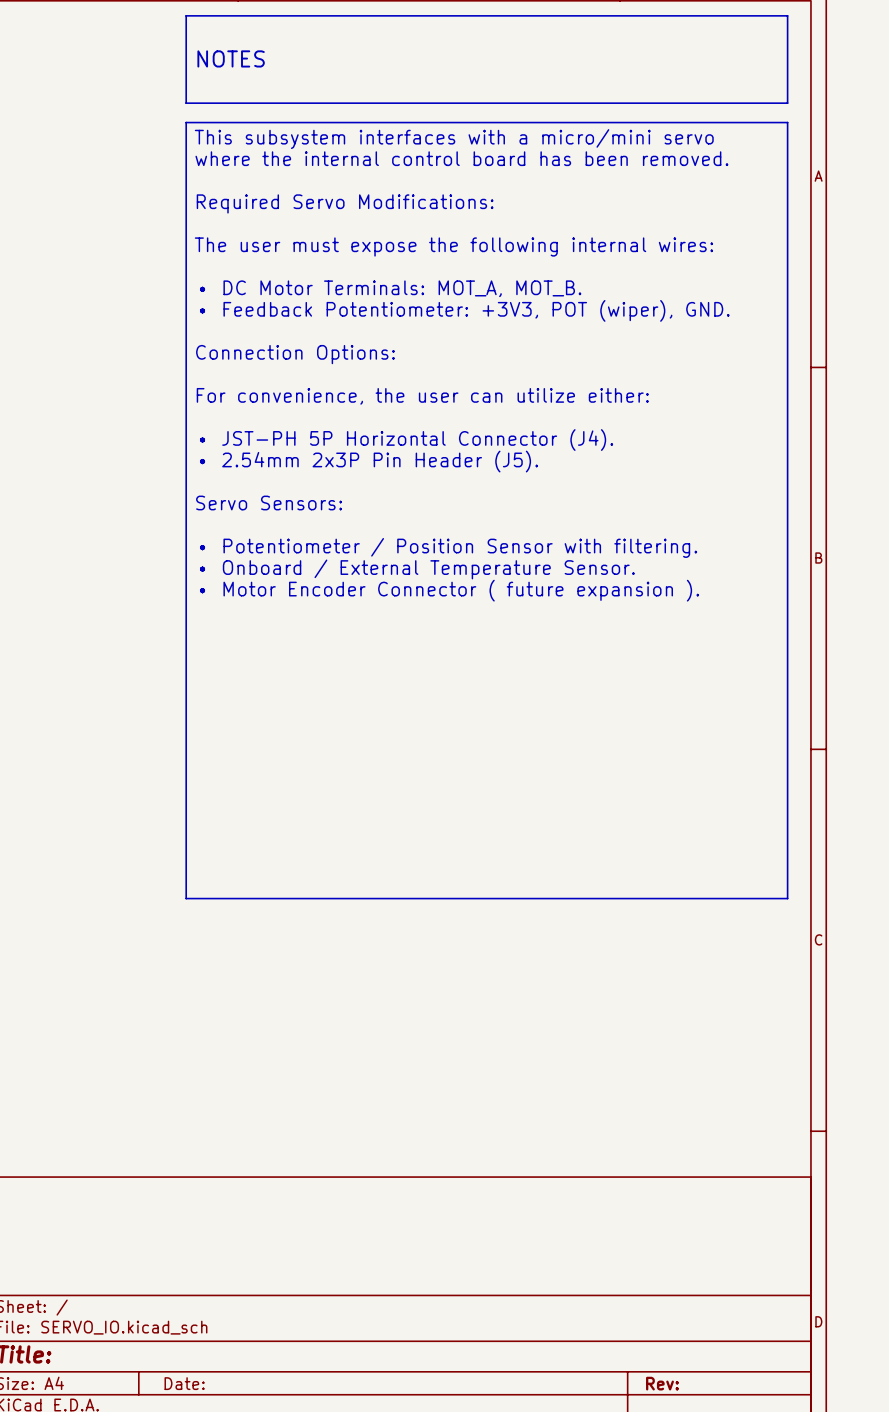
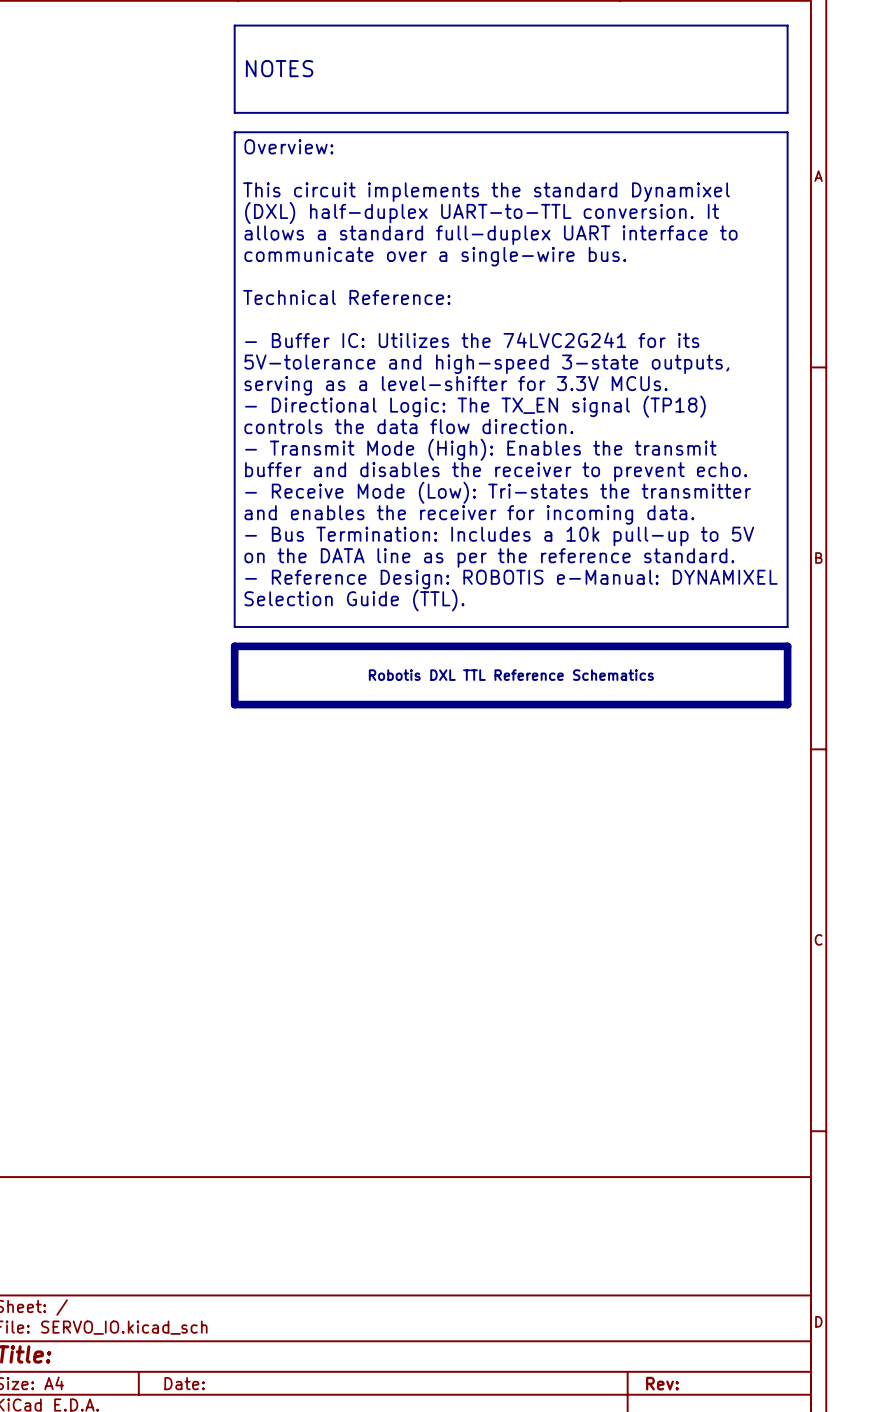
line: (787, 25) (787, 15) (186, 15) (186, 103) (787, 103) -> (787, 25) (234, 25) (234, 112) (787, 112) (787, 103)
text position: NOTES (231, 58) -> NOTES (279, 68)
line: (787, 132) (787, 122) (186, 122) (186, 898) (787, 898) (787, 704) -> (787, 132) (234, 132) (234, 626) (787, 626)
text: This subsystem interfaces with a micro/mini servo (454, 139) -> none
text: none -> Overview: (288, 146)
text: where the internal control board has been removed. (461, 158) -> none
text: none -> This circuit implements the standard Dynamixel (486, 192)
text: Required Servo Modifications: (345, 203) -> none
text: none -> (DXL) half-duplex UART-to-TTL conversion. It (482, 213)
text: none -> allows a standard full-duplex UART interface to (490, 235)
text: The user must expose the following internal wires: (453, 246) -> none
text: none -> communicate over a single-wire bus. (435, 256)
text: • DC Motor Terminals: MOT_A, MOT_B. (390, 288) -> none
text: none -> Technical Reference: (346, 297)
text: • Feedback Potentiometer: +3V3, POT (wiper), GND. (464, 310) -> none
text: none -> - Buffer IC: Utilizes the 74LVC2G241 for its (472, 340)
text: Connection Options: (295, 354) -> none
text: none -> 5V-tolerance and high-speed 3-state outputs, (486, 364)
text: none -> serving as a level-shifter for 3.3V MCUs. (455, 385)
text: For convenience, the user can utilize either: (422, 396) -> none
text: none -> - Directional Logic: The TX_EN signal (TP18) (475, 406)
text: none -> controls the data flow direction. (408, 426)
text: • JST-PH 5P Horizontal Connector (J4). (406, 440) -> none
text: none -> - Transmit Mode (High): Enables the transmit (480, 449)
text: • 2.54mm 2x3P Pin Header (J5). (368, 461) -> none
text: none -> buffer and disables the receiver to prevent echo. (496, 471)
text: none -> - Receive Mode (Low): Tri-states the transmitter (497, 492)
text: Servo Sensors: (269, 502) -> none
text: none -> and enables the receiver for incoming data. (469, 514)
text: none -> - Bus Termination: Includes a 10k pull-up to 5V (499, 536)
text: • Potentiometer / Position Sensor with filtering. (448, 547) -> none
text: none -> on the DATA line as per the reference standard. (489, 557)
text: • Onboard / External Temperature Sensor. (417, 569) -> none
text: none -> - Reference Design: ROBOTIS e-Manual: DYNAMIXEL (511, 579)
text: • Motor Encoder Connector ( future expansion ). (449, 590) -> none
text: none -> Selection Guide (TTL). (354, 600)
line: (787, 626) (787, 646) -> (787, 704) (234, 704) (234, 646) (787, 646)
line width: thin (787, 646) (787, 704) -> thick (787, 646) (787, 704)
text: none -> Robotis DXL TTL Reference Schematics (511, 675)

